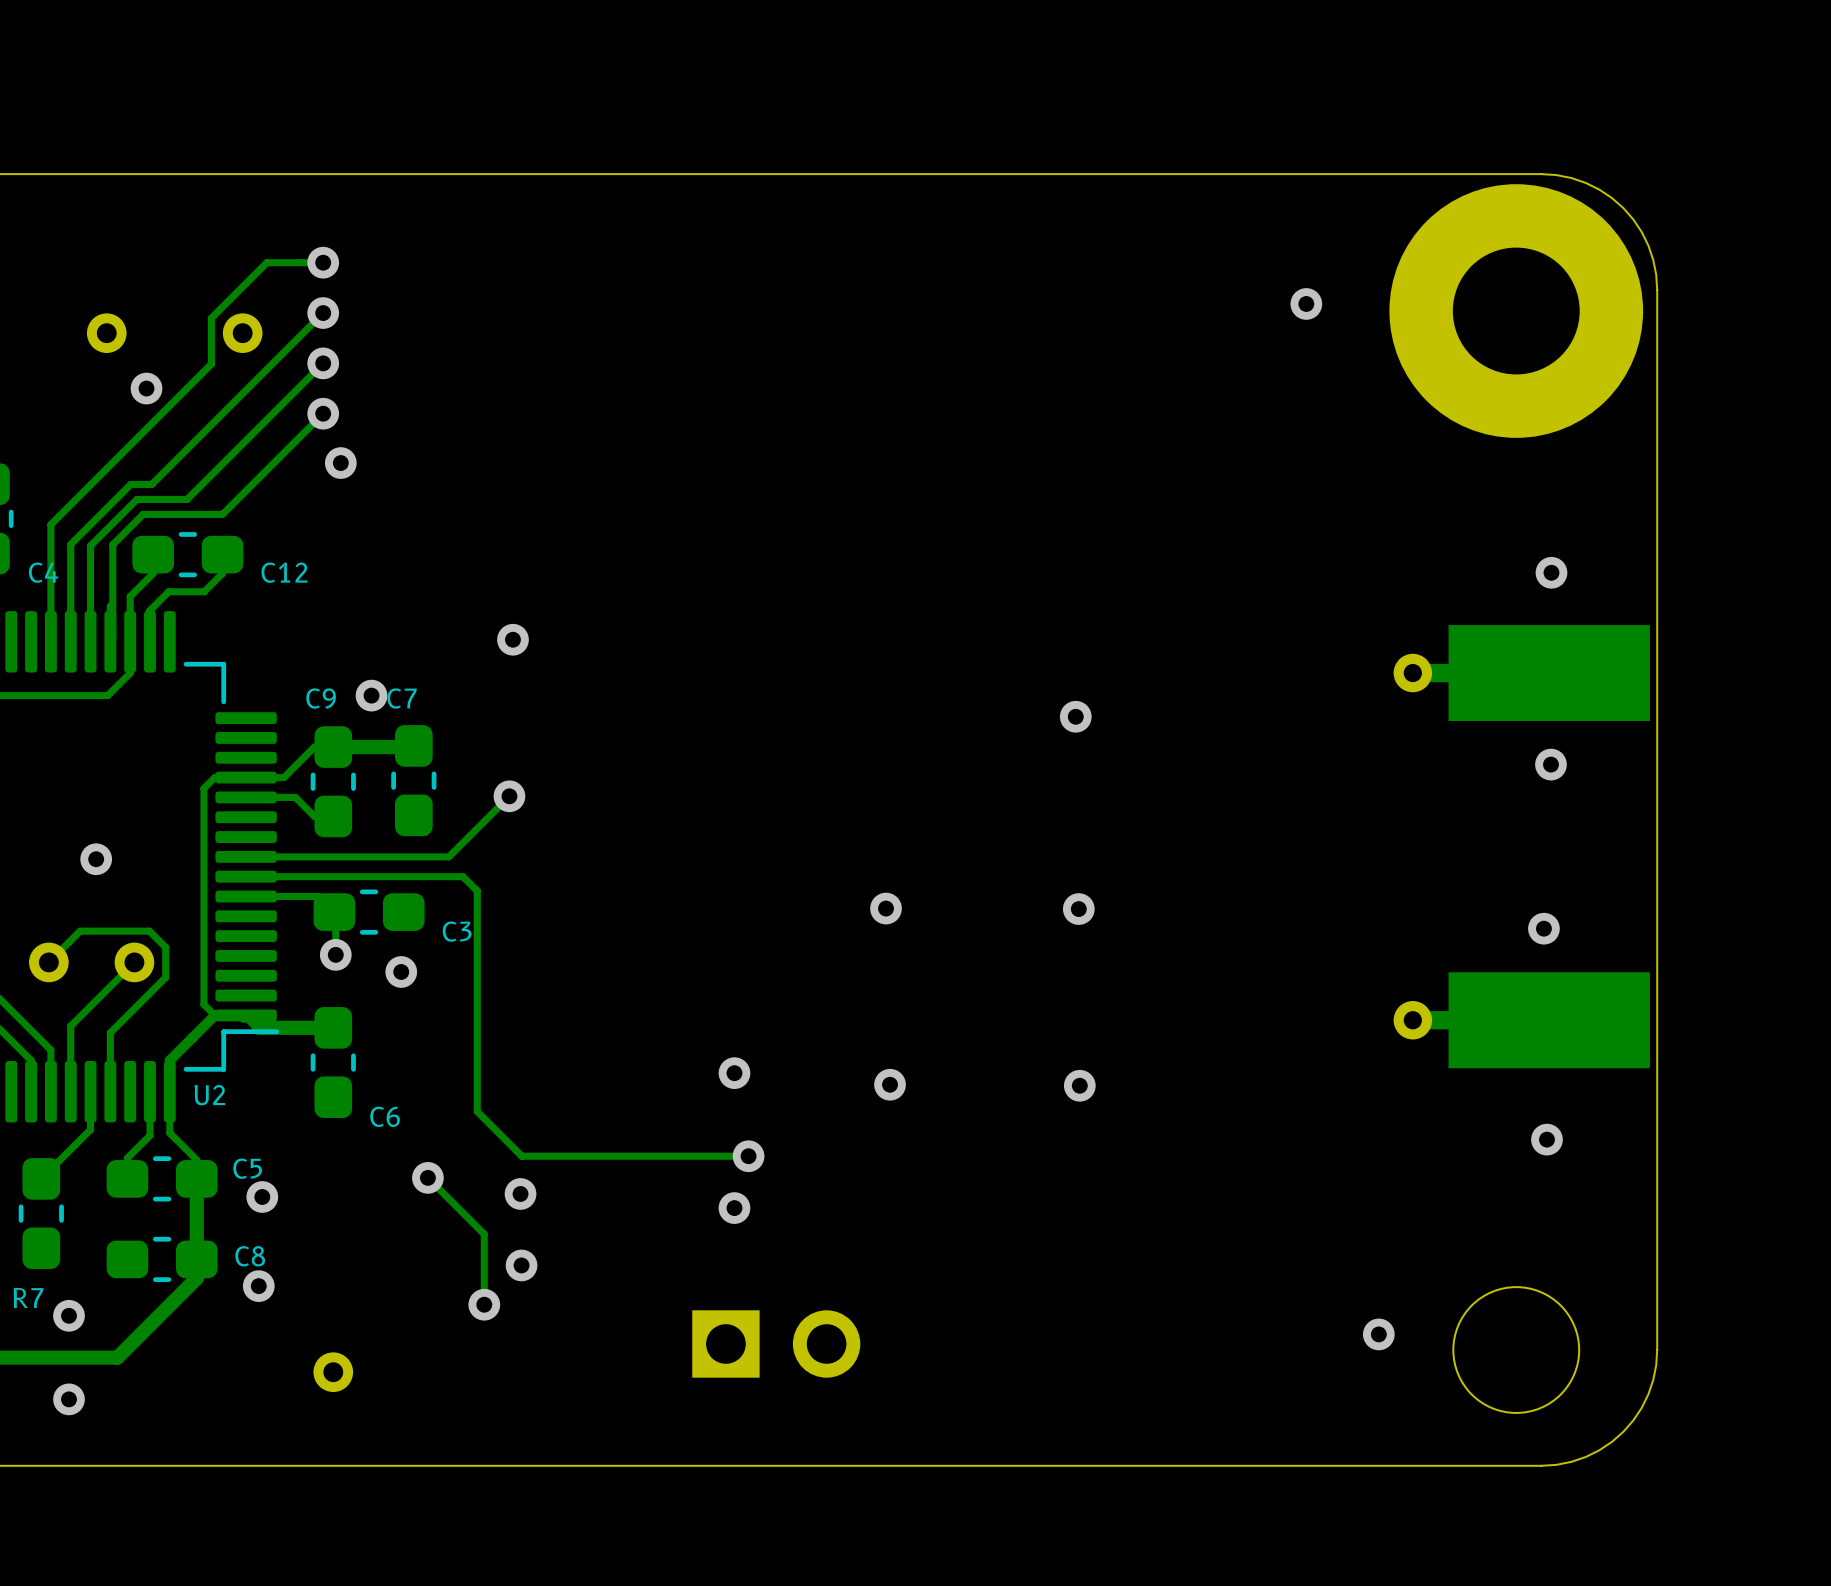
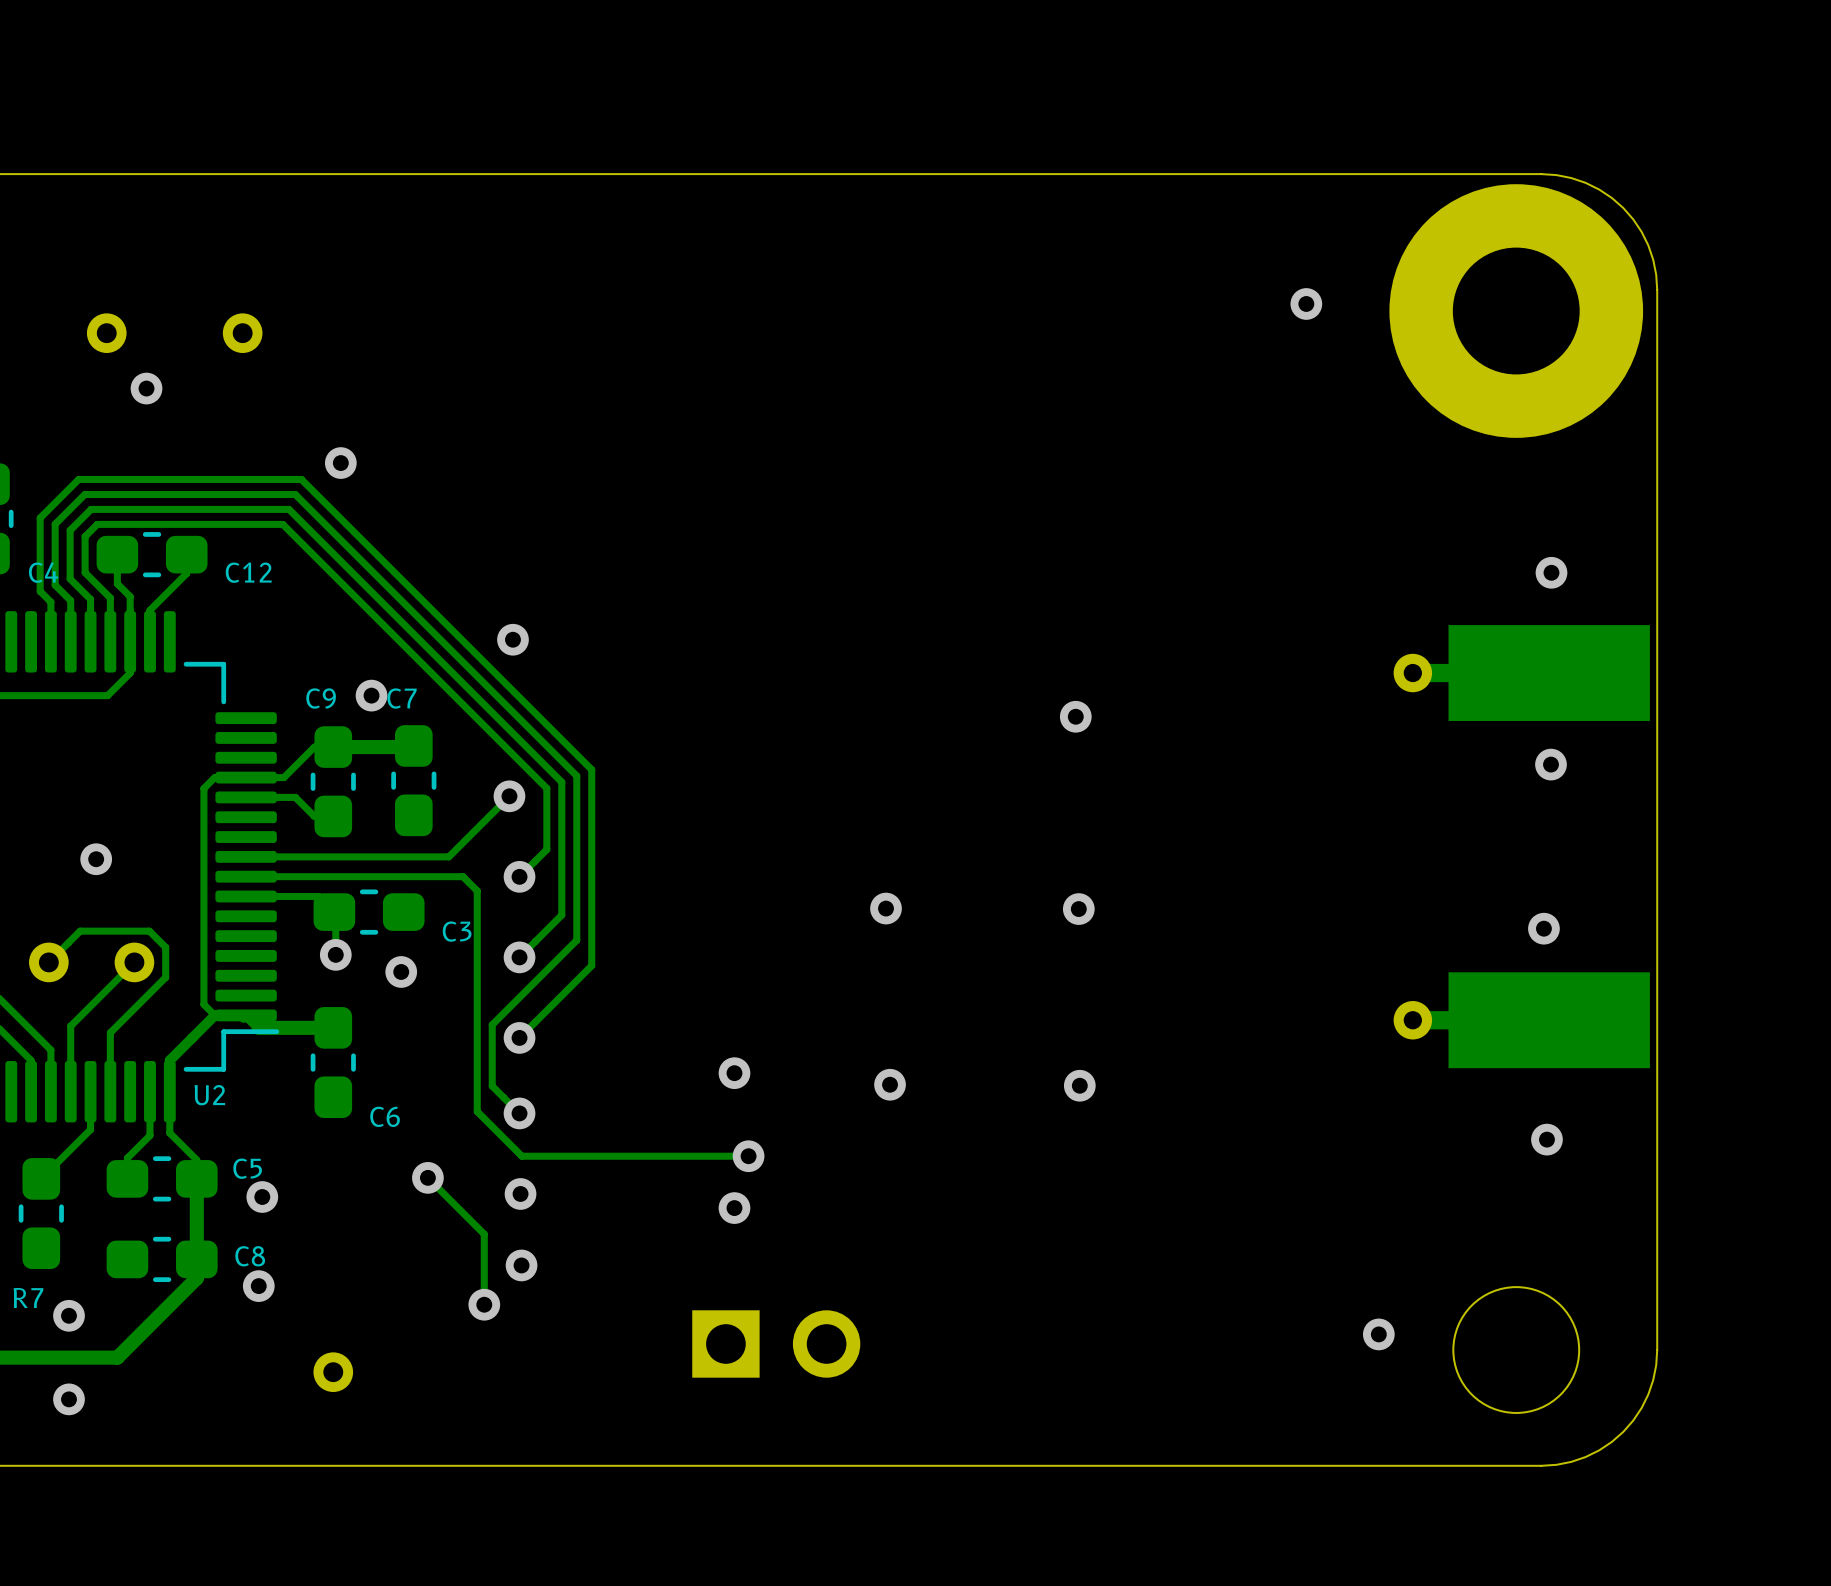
track: (323, 262) (266, 262) (211, 318) (211, 364) (50, 524) (50, 602) -> (519, 1037) (591, 965) (591, 769) (301, 479) (78, 479) (40, 518) (40, 591) (50, 602)
via: (323, 262) -> none
track: (323, 313) (151, 484) (130, 484) (70, 544) (70, 600) -> (519, 1113) (492, 1086) (492, 1024) (576, 940) (576, 775) (295, 494) (84, 494) (55, 524) (55, 585) (70, 600)
via: (323, 313) -> none
track: (323, 363) (187, 499) (136, 499) (90, 545) (90, 599) -> (519, 957) (561, 915) (561, 782) (289, 509) (91, 509) (70, 530) (70, 578) (90, 599)
via: (323, 363) -> none
track: (323, 413) (222, 514) (143, 514) (112, 544) (112, 639) (110, 641) -> none
via: (323, 413) -> none
track: (153, 554) (153, 573) (130, 596) -> (117, 554) (117, 583) (130, 596)
C12 position: (187, 554) -> (152, 554)
track: (222, 554) (222, 573) (204, 591) (168, 591) (149, 610) -> (186, 554) (186, 573) (149, 610)
track: none -> (110, 605) (110, 597) (85, 572) (85, 536) (97, 524) (282, 524) (546, 788) (546, 849) (519, 876)
via: none -> (519, 876)
via: none -> (519, 957)
via: none -> (519, 1037)
via: none -> (519, 1113)

